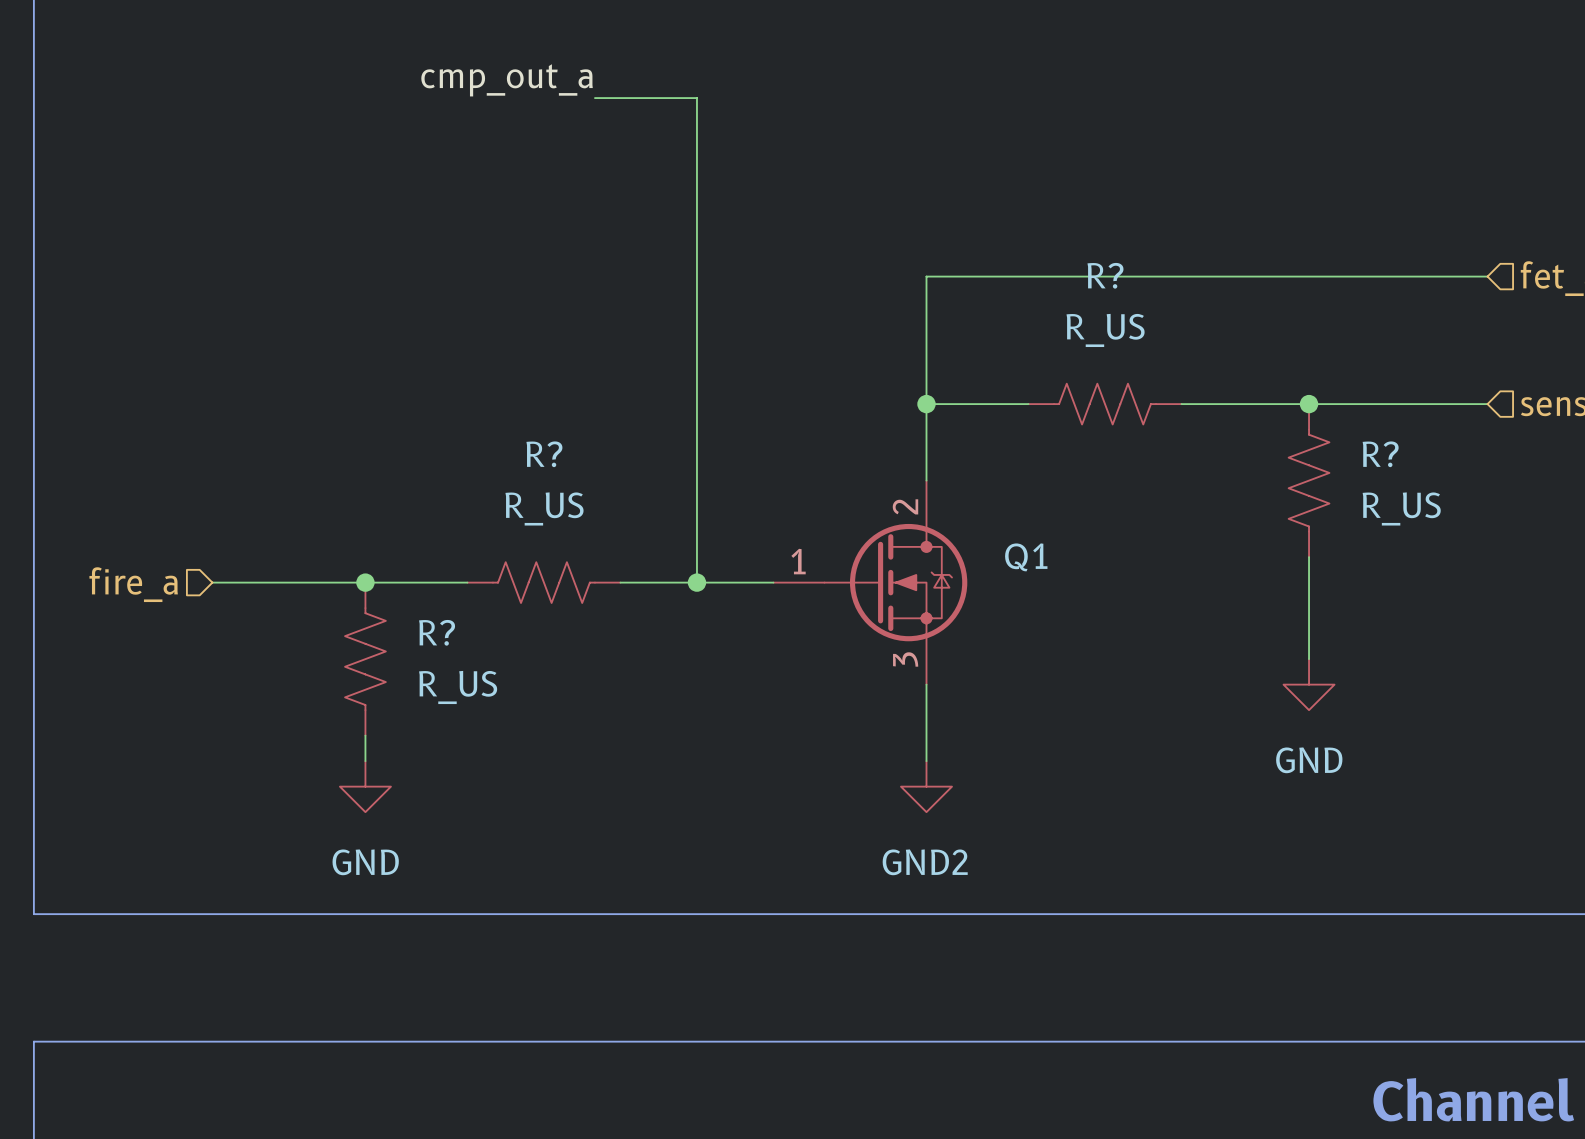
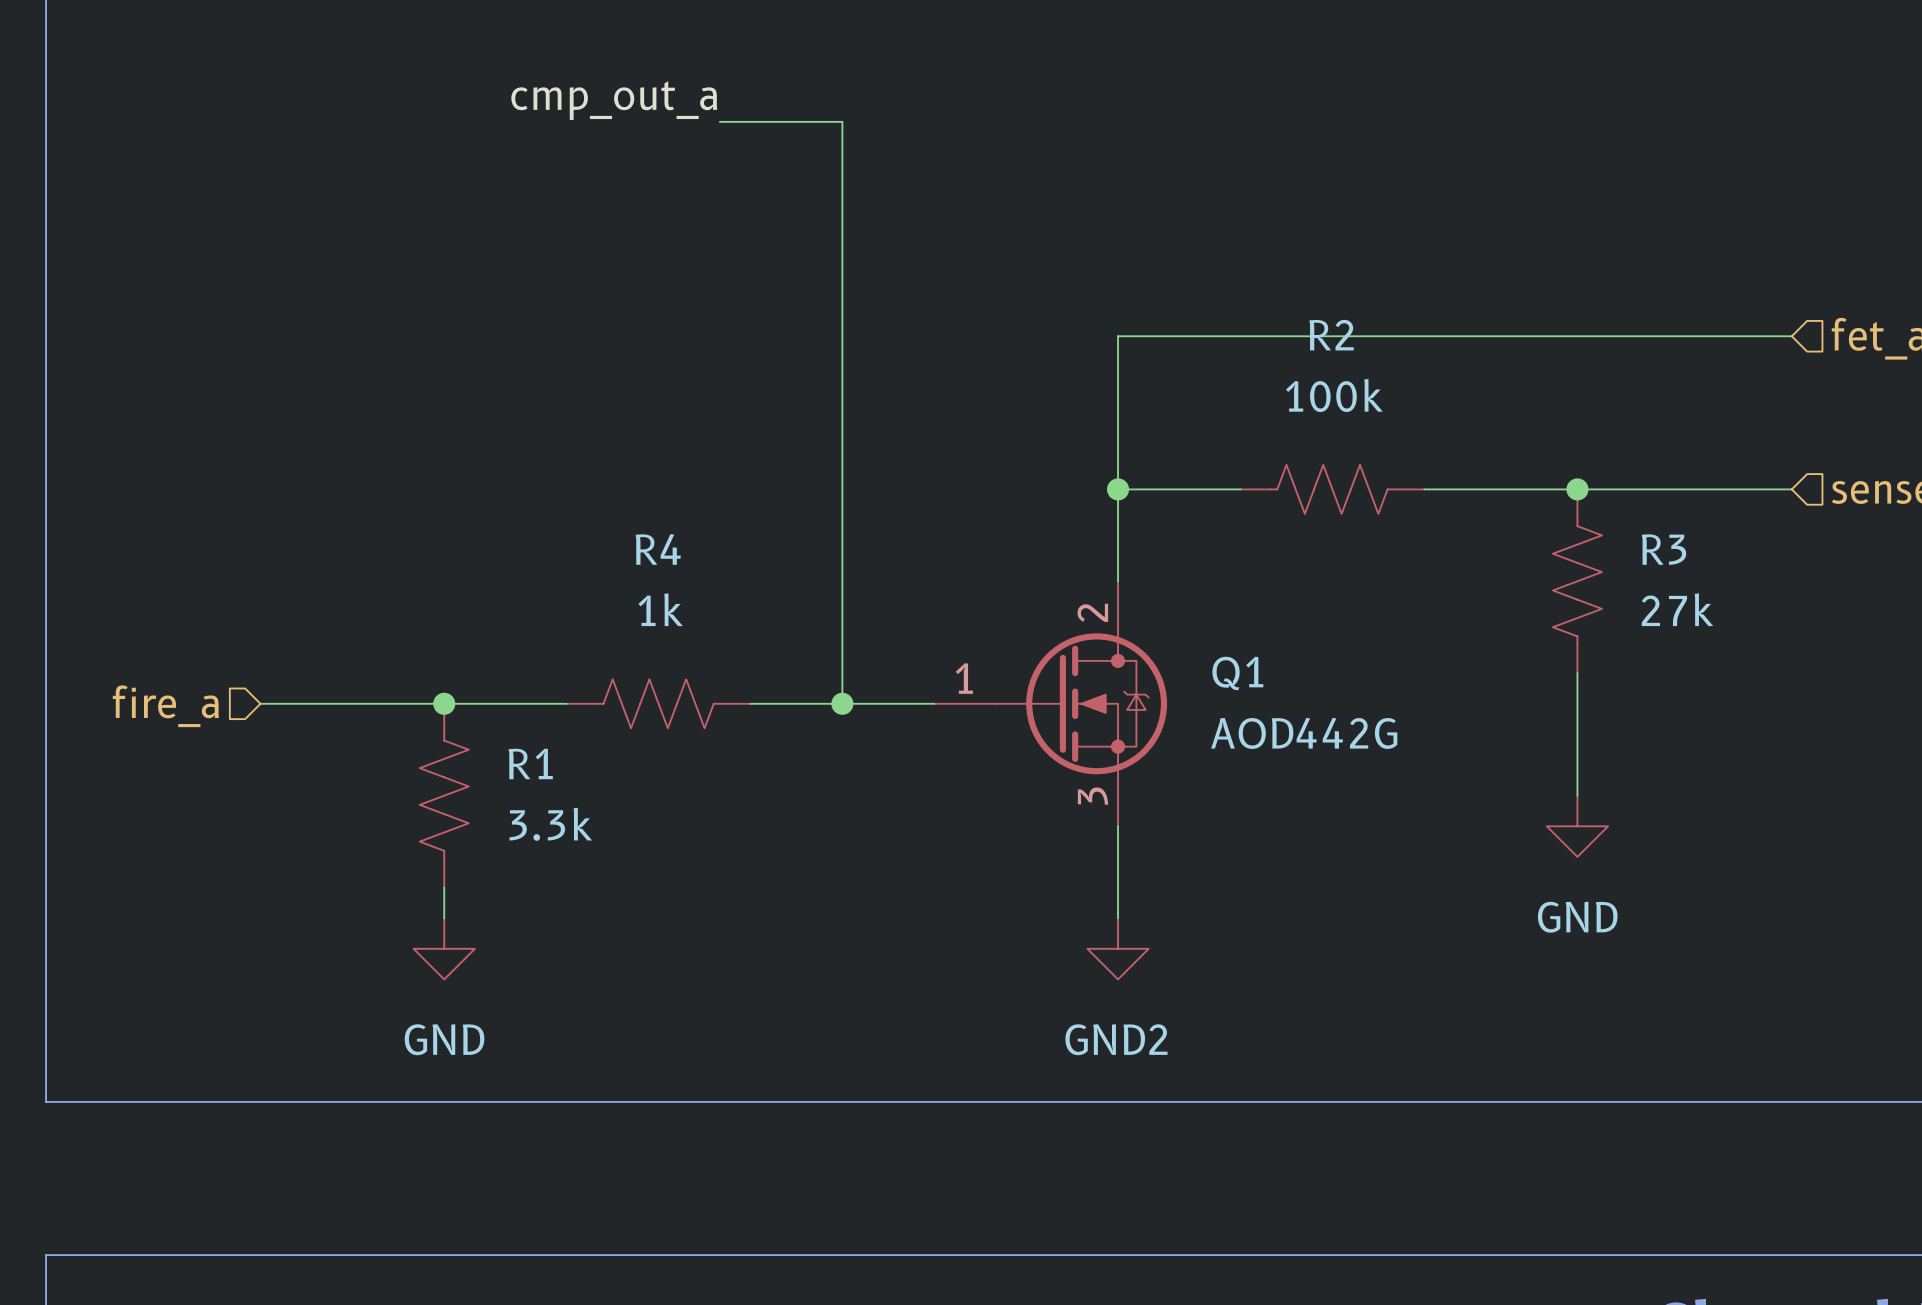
R? name: R? (1105, 275) -> R2 (1331, 335)
R? value: R_US (1105, 330) -> 100k (1334, 395)
R? name: R? (544, 454) -> R4 (658, 549)
R? name: R? (1380, 454) -> R3 (1664, 549)
R? value: R_US (544, 508) -> 1k (660, 609)
R? value: R_US (1401, 508) -> 27k (1677, 609)
Q1 value: none -> AOD442G (1304, 733)
R? name: R? (437, 632) -> R1 (530, 763)
R? value: R_US (458, 687) -> 3.3k (550, 824)

